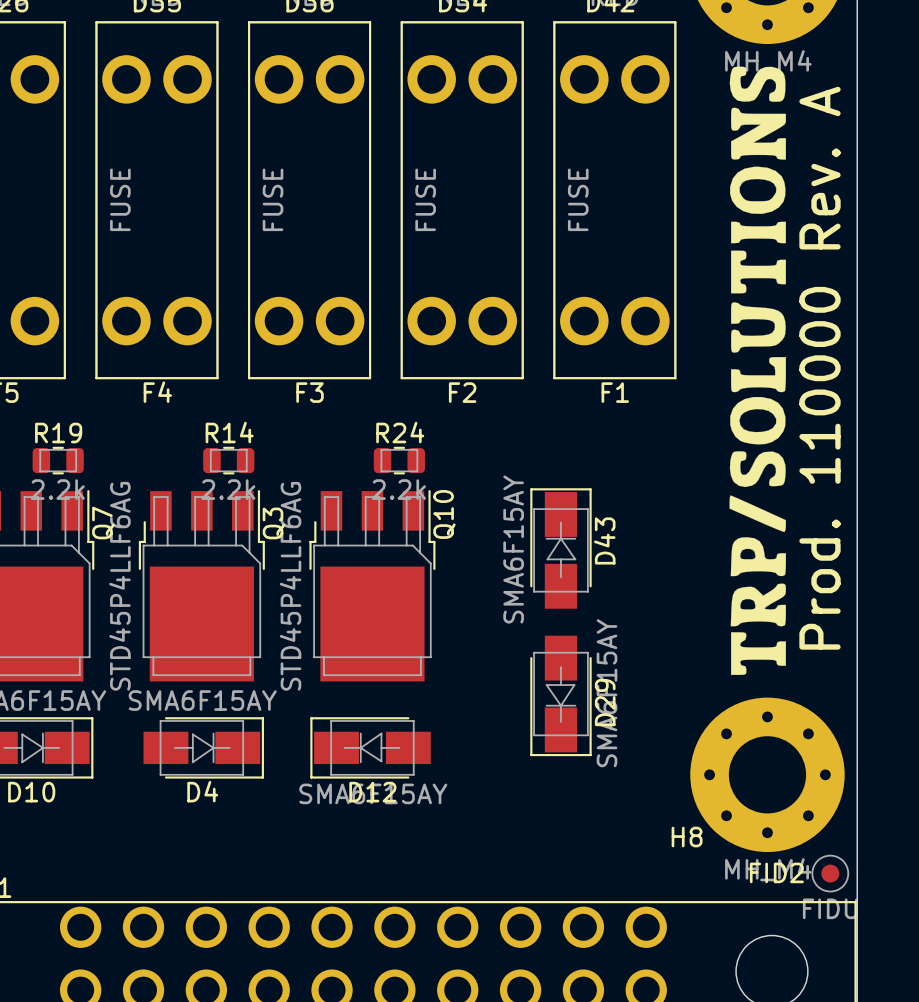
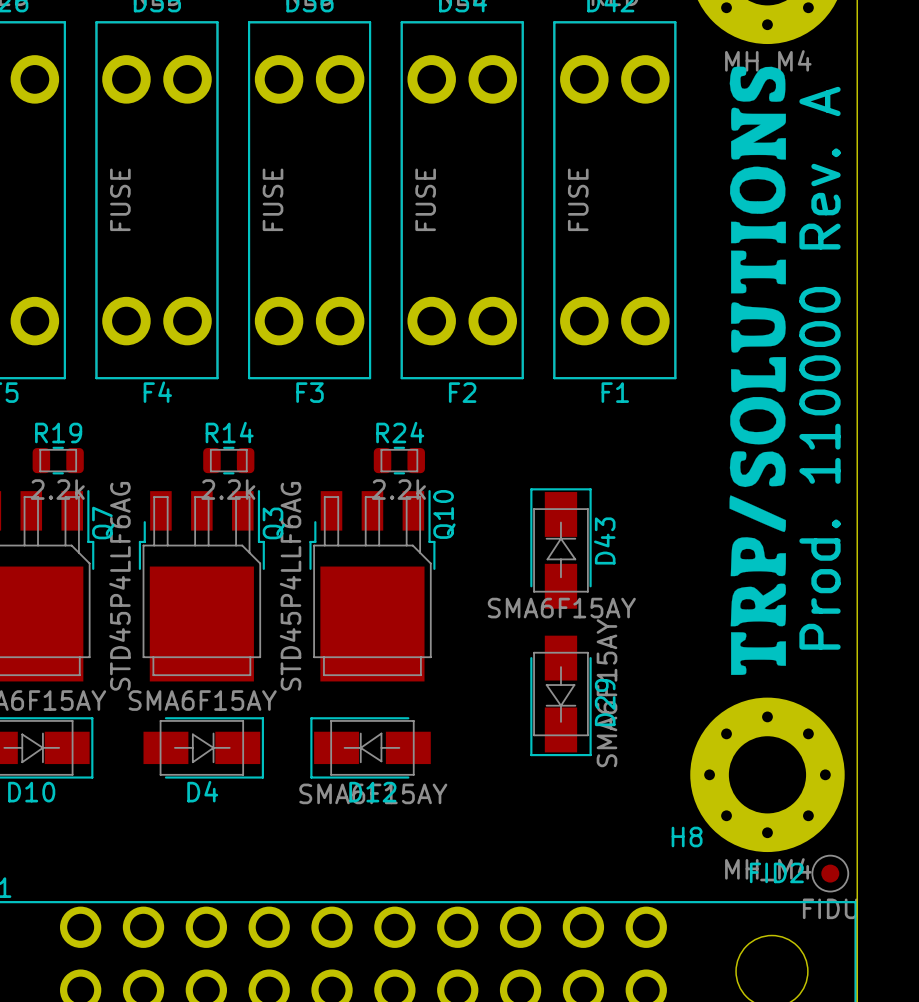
D43 value rotation: 0° (513, 549) -> 90° clockwise (561, 608)

